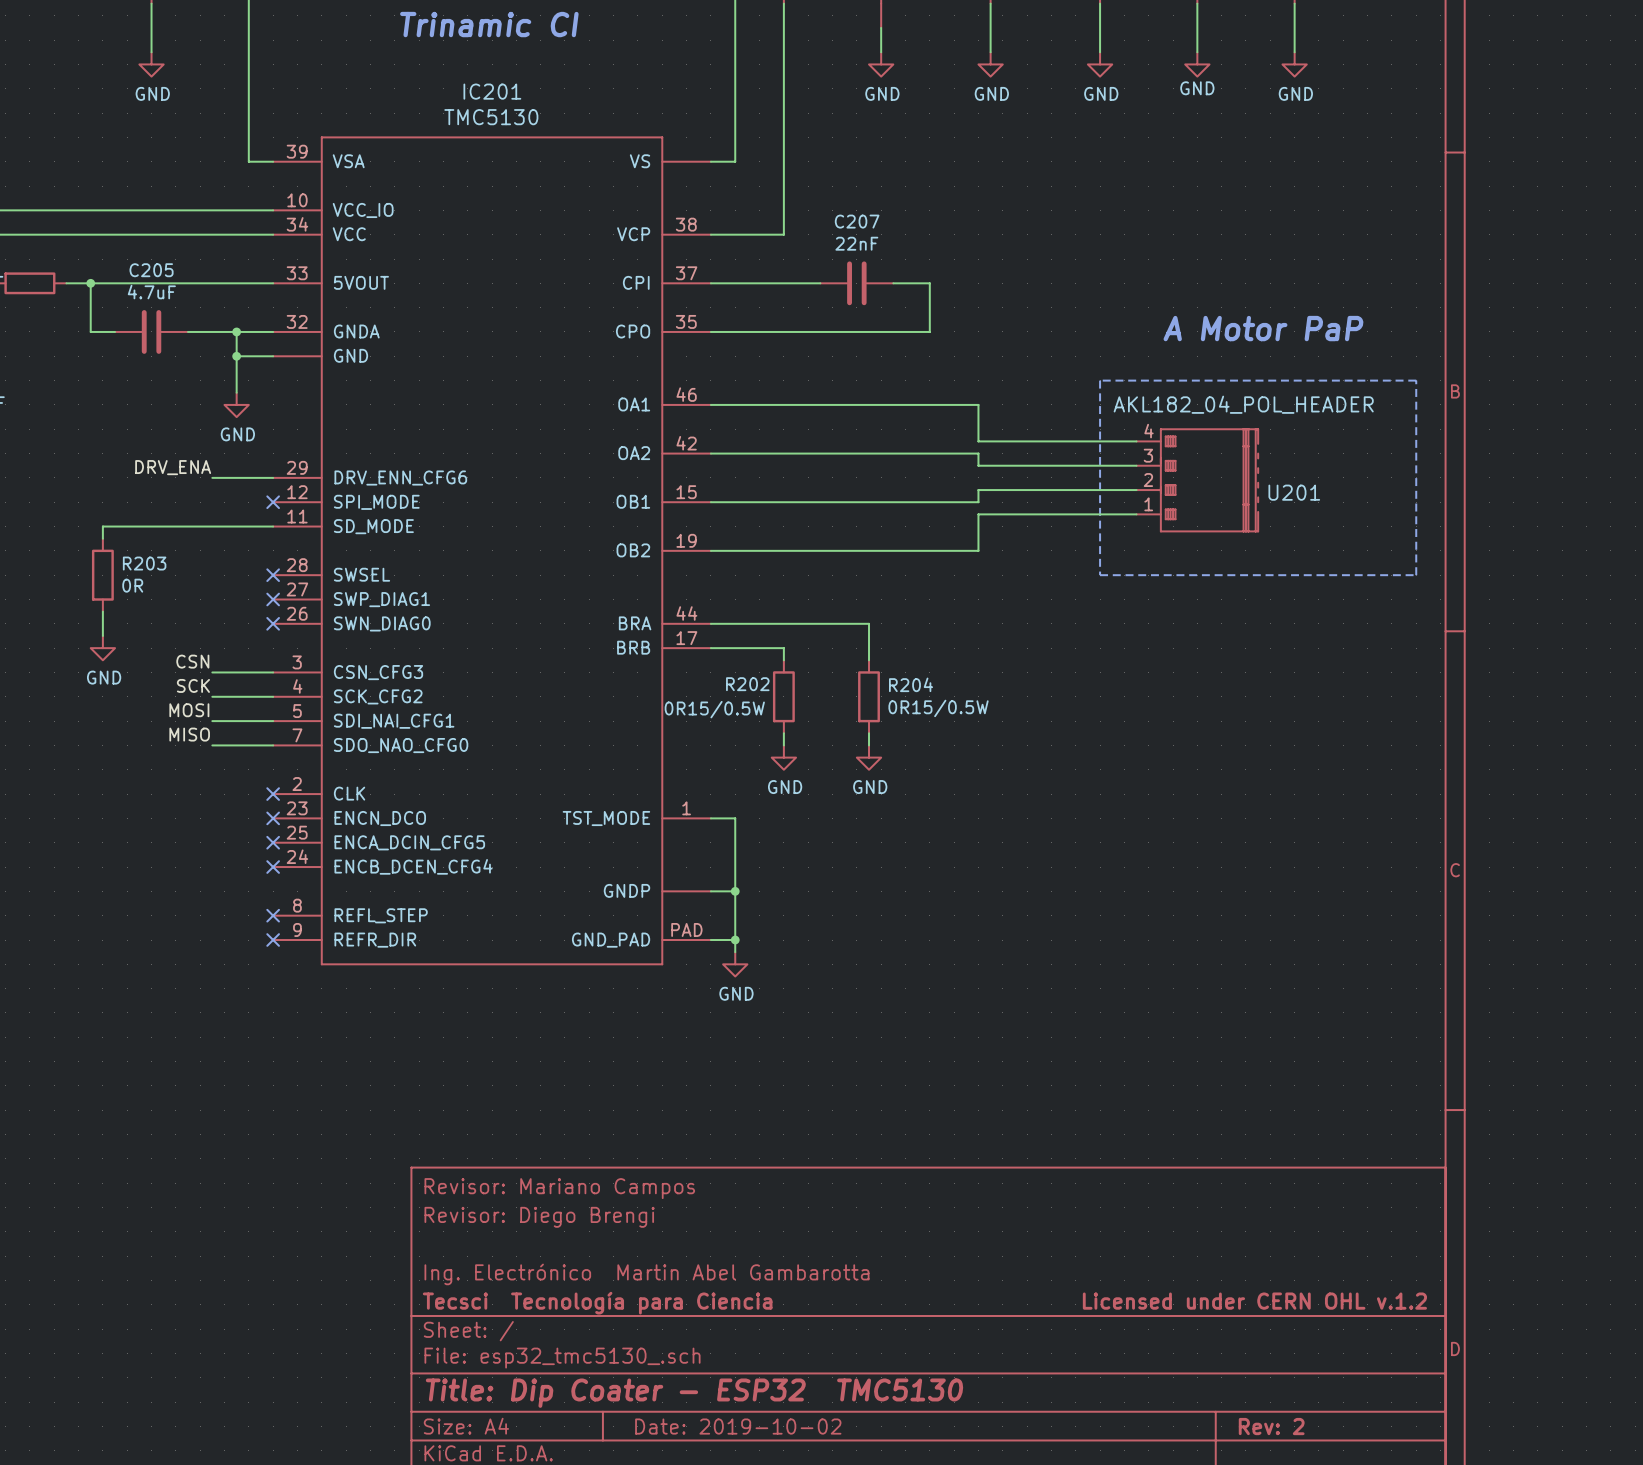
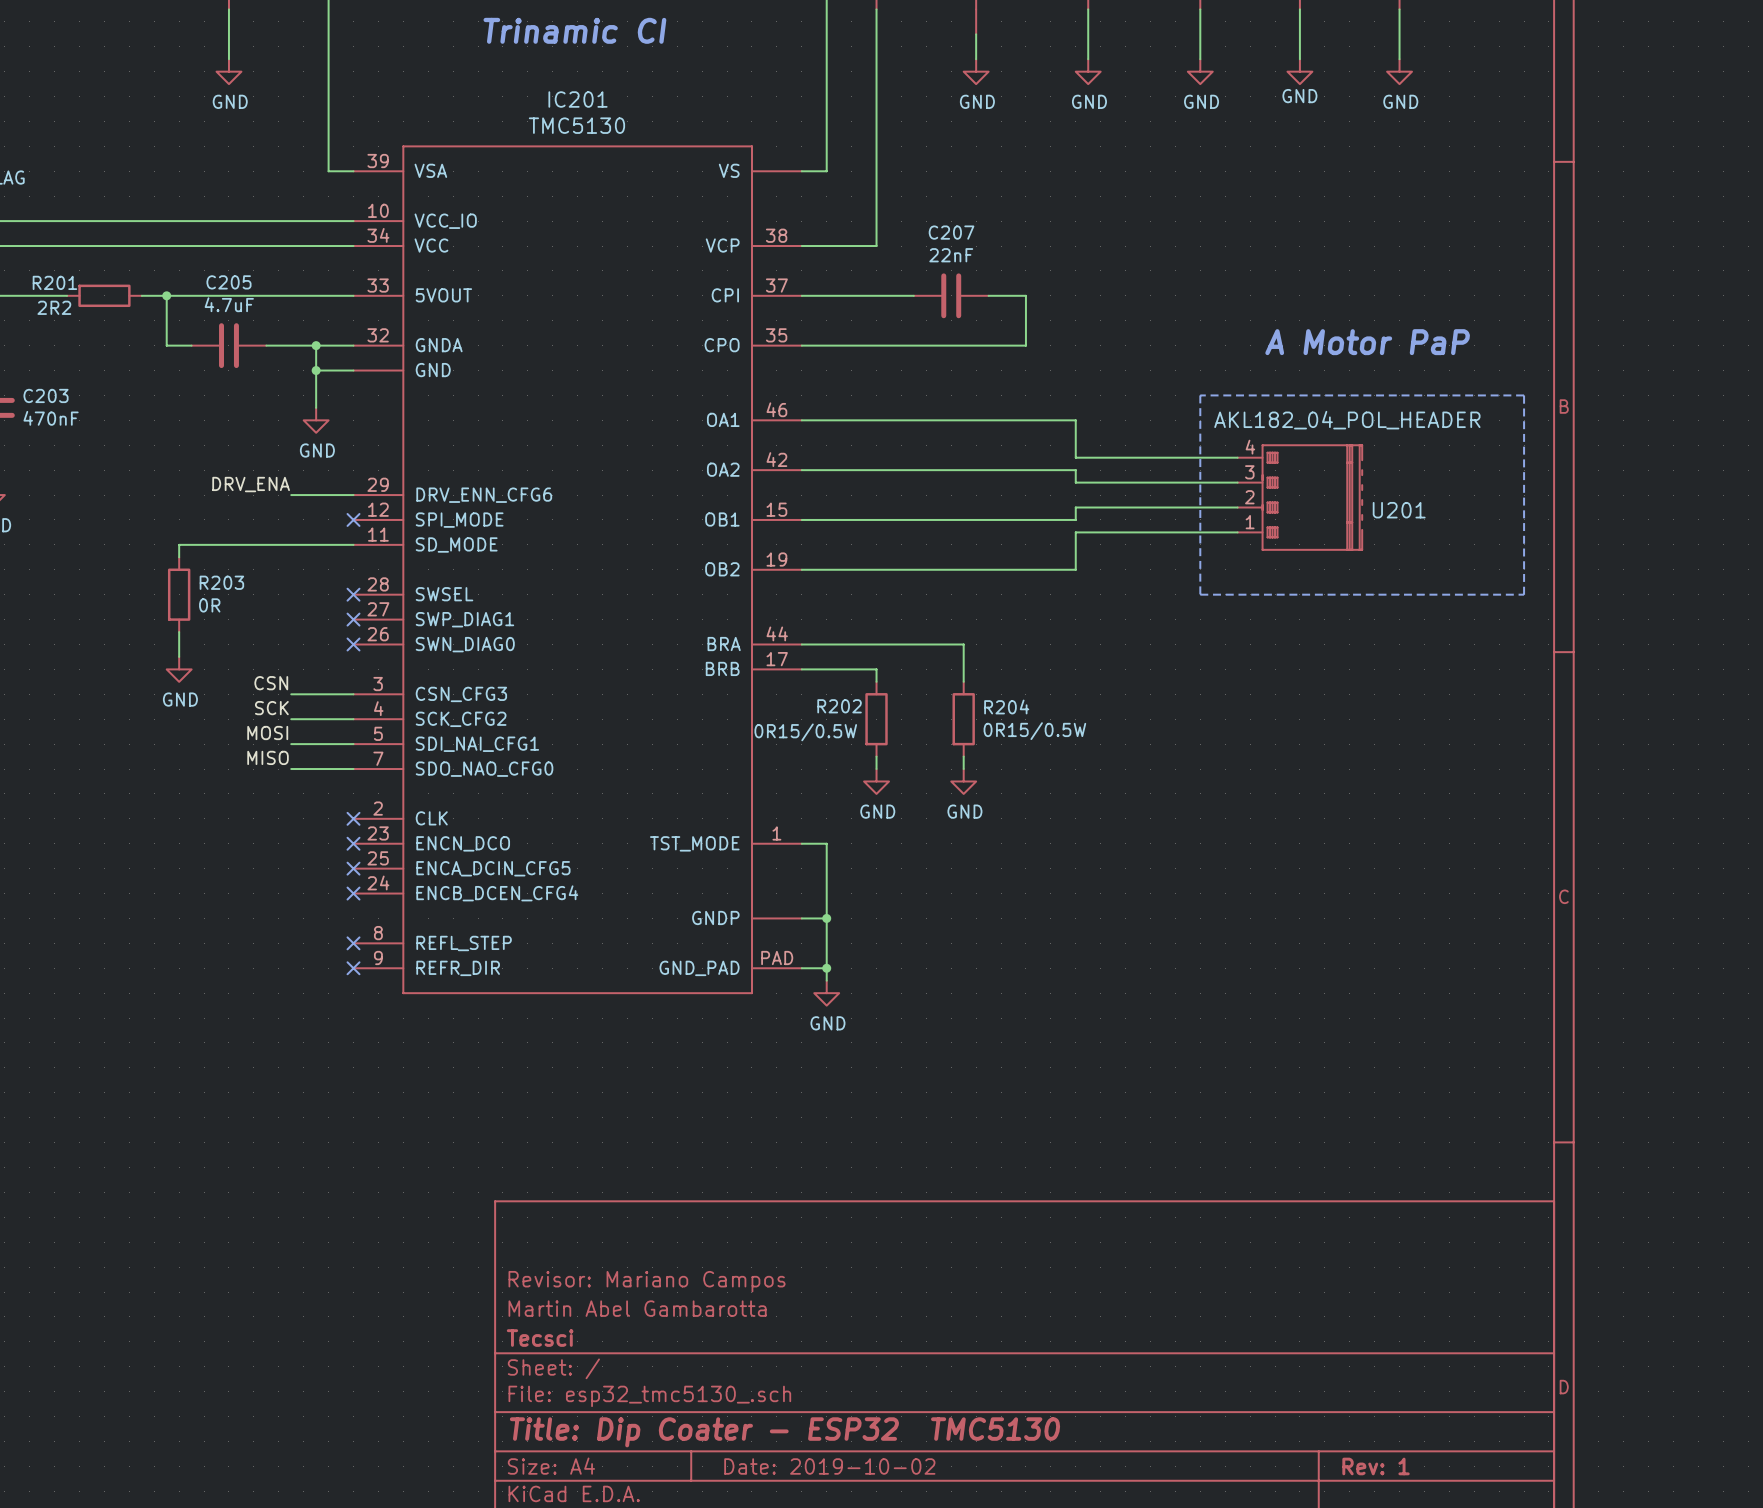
title block position: Revisor: Mariano Campos (559, 1188) -> Revisor: Mariano Campos (647, 1281)
title block: Revisor: Diego Brengi (539, 1217) -> none
title block: Ing. Electrónico Martin Abel Gambarotta (646, 1274) -> Martin Abel Gambarotta (637, 1308)
title block: Tecsci Tecnología para Ciencia Licensed under CERN OHL v.1.2 (924, 1303) -> Tecsci (540, 1338)
title block: Rev: 2 (1271, 1426) -> Rev: 1 (1376, 1466)

